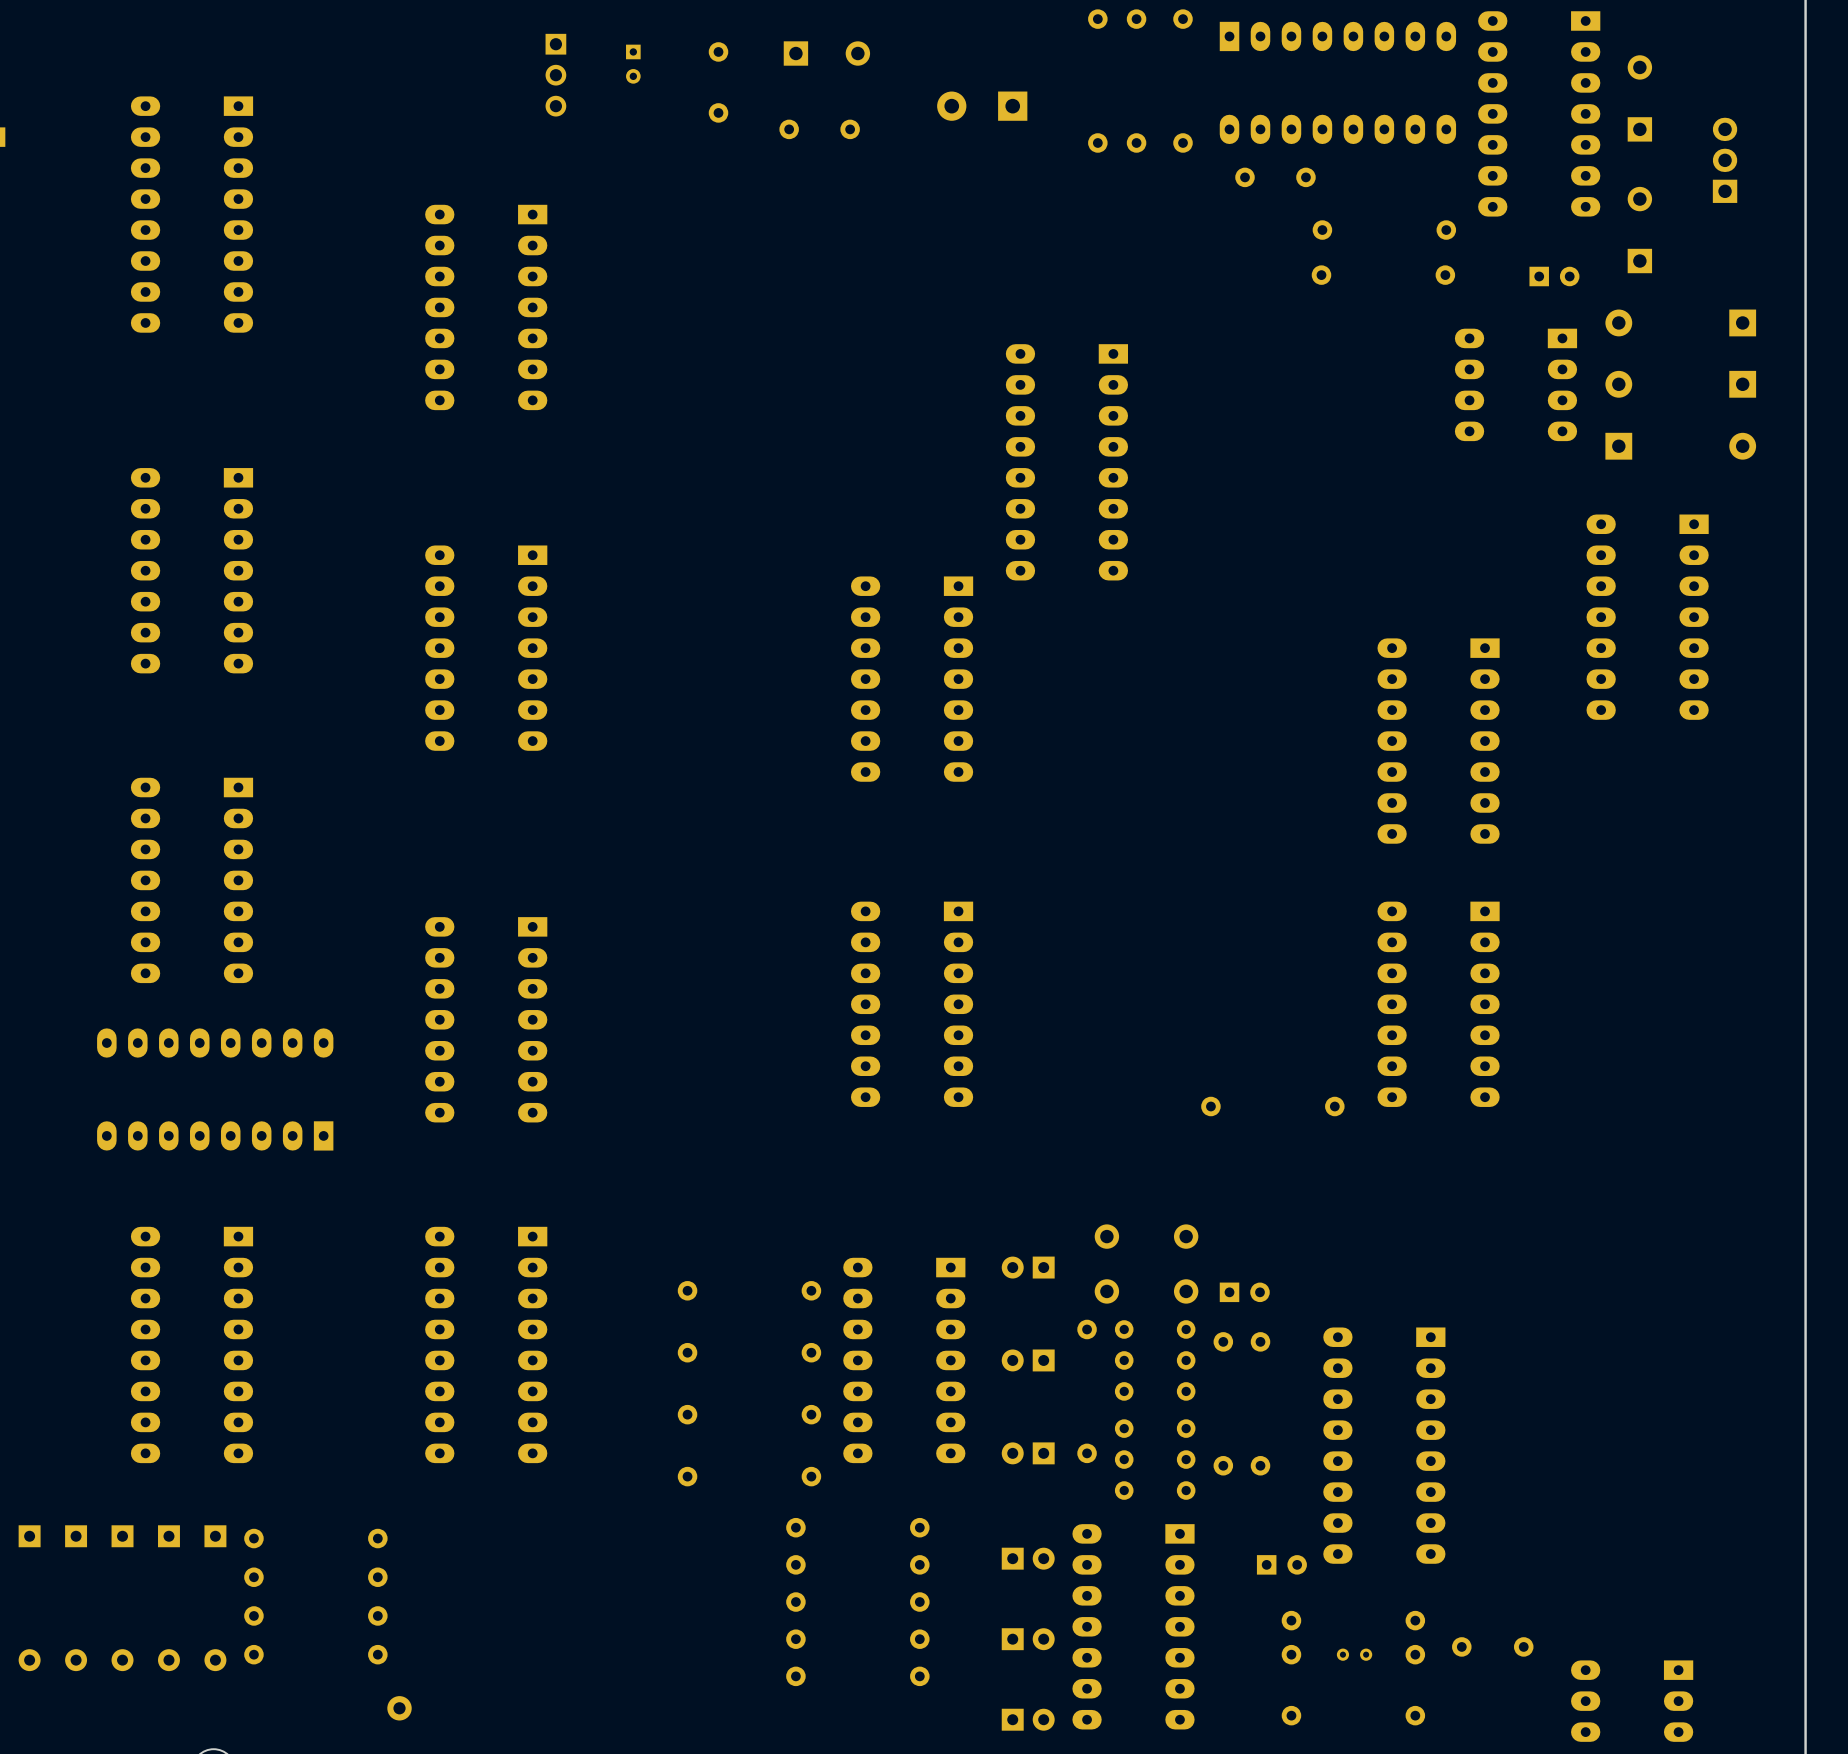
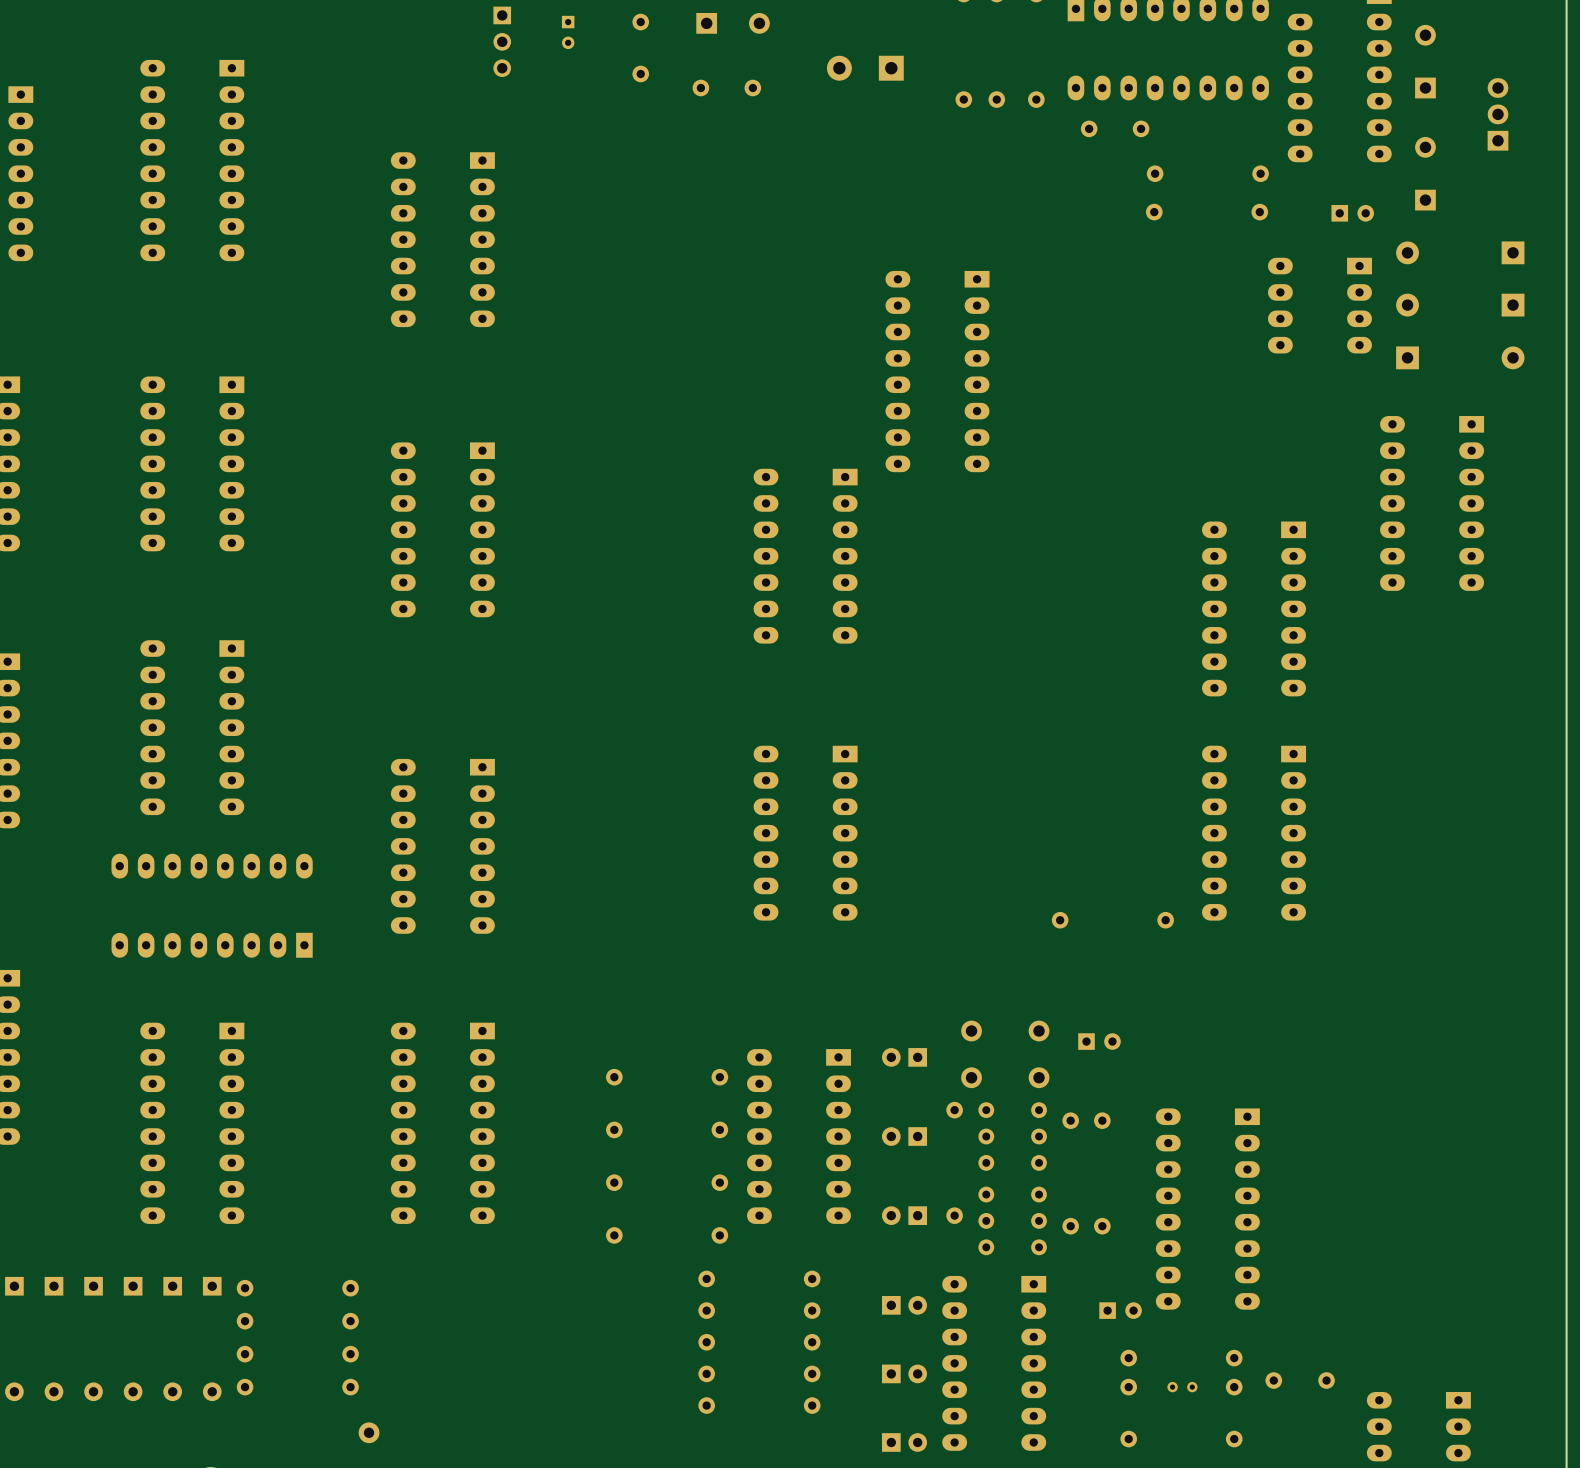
part position: (1244, 1292) -> (1099, 1041)

